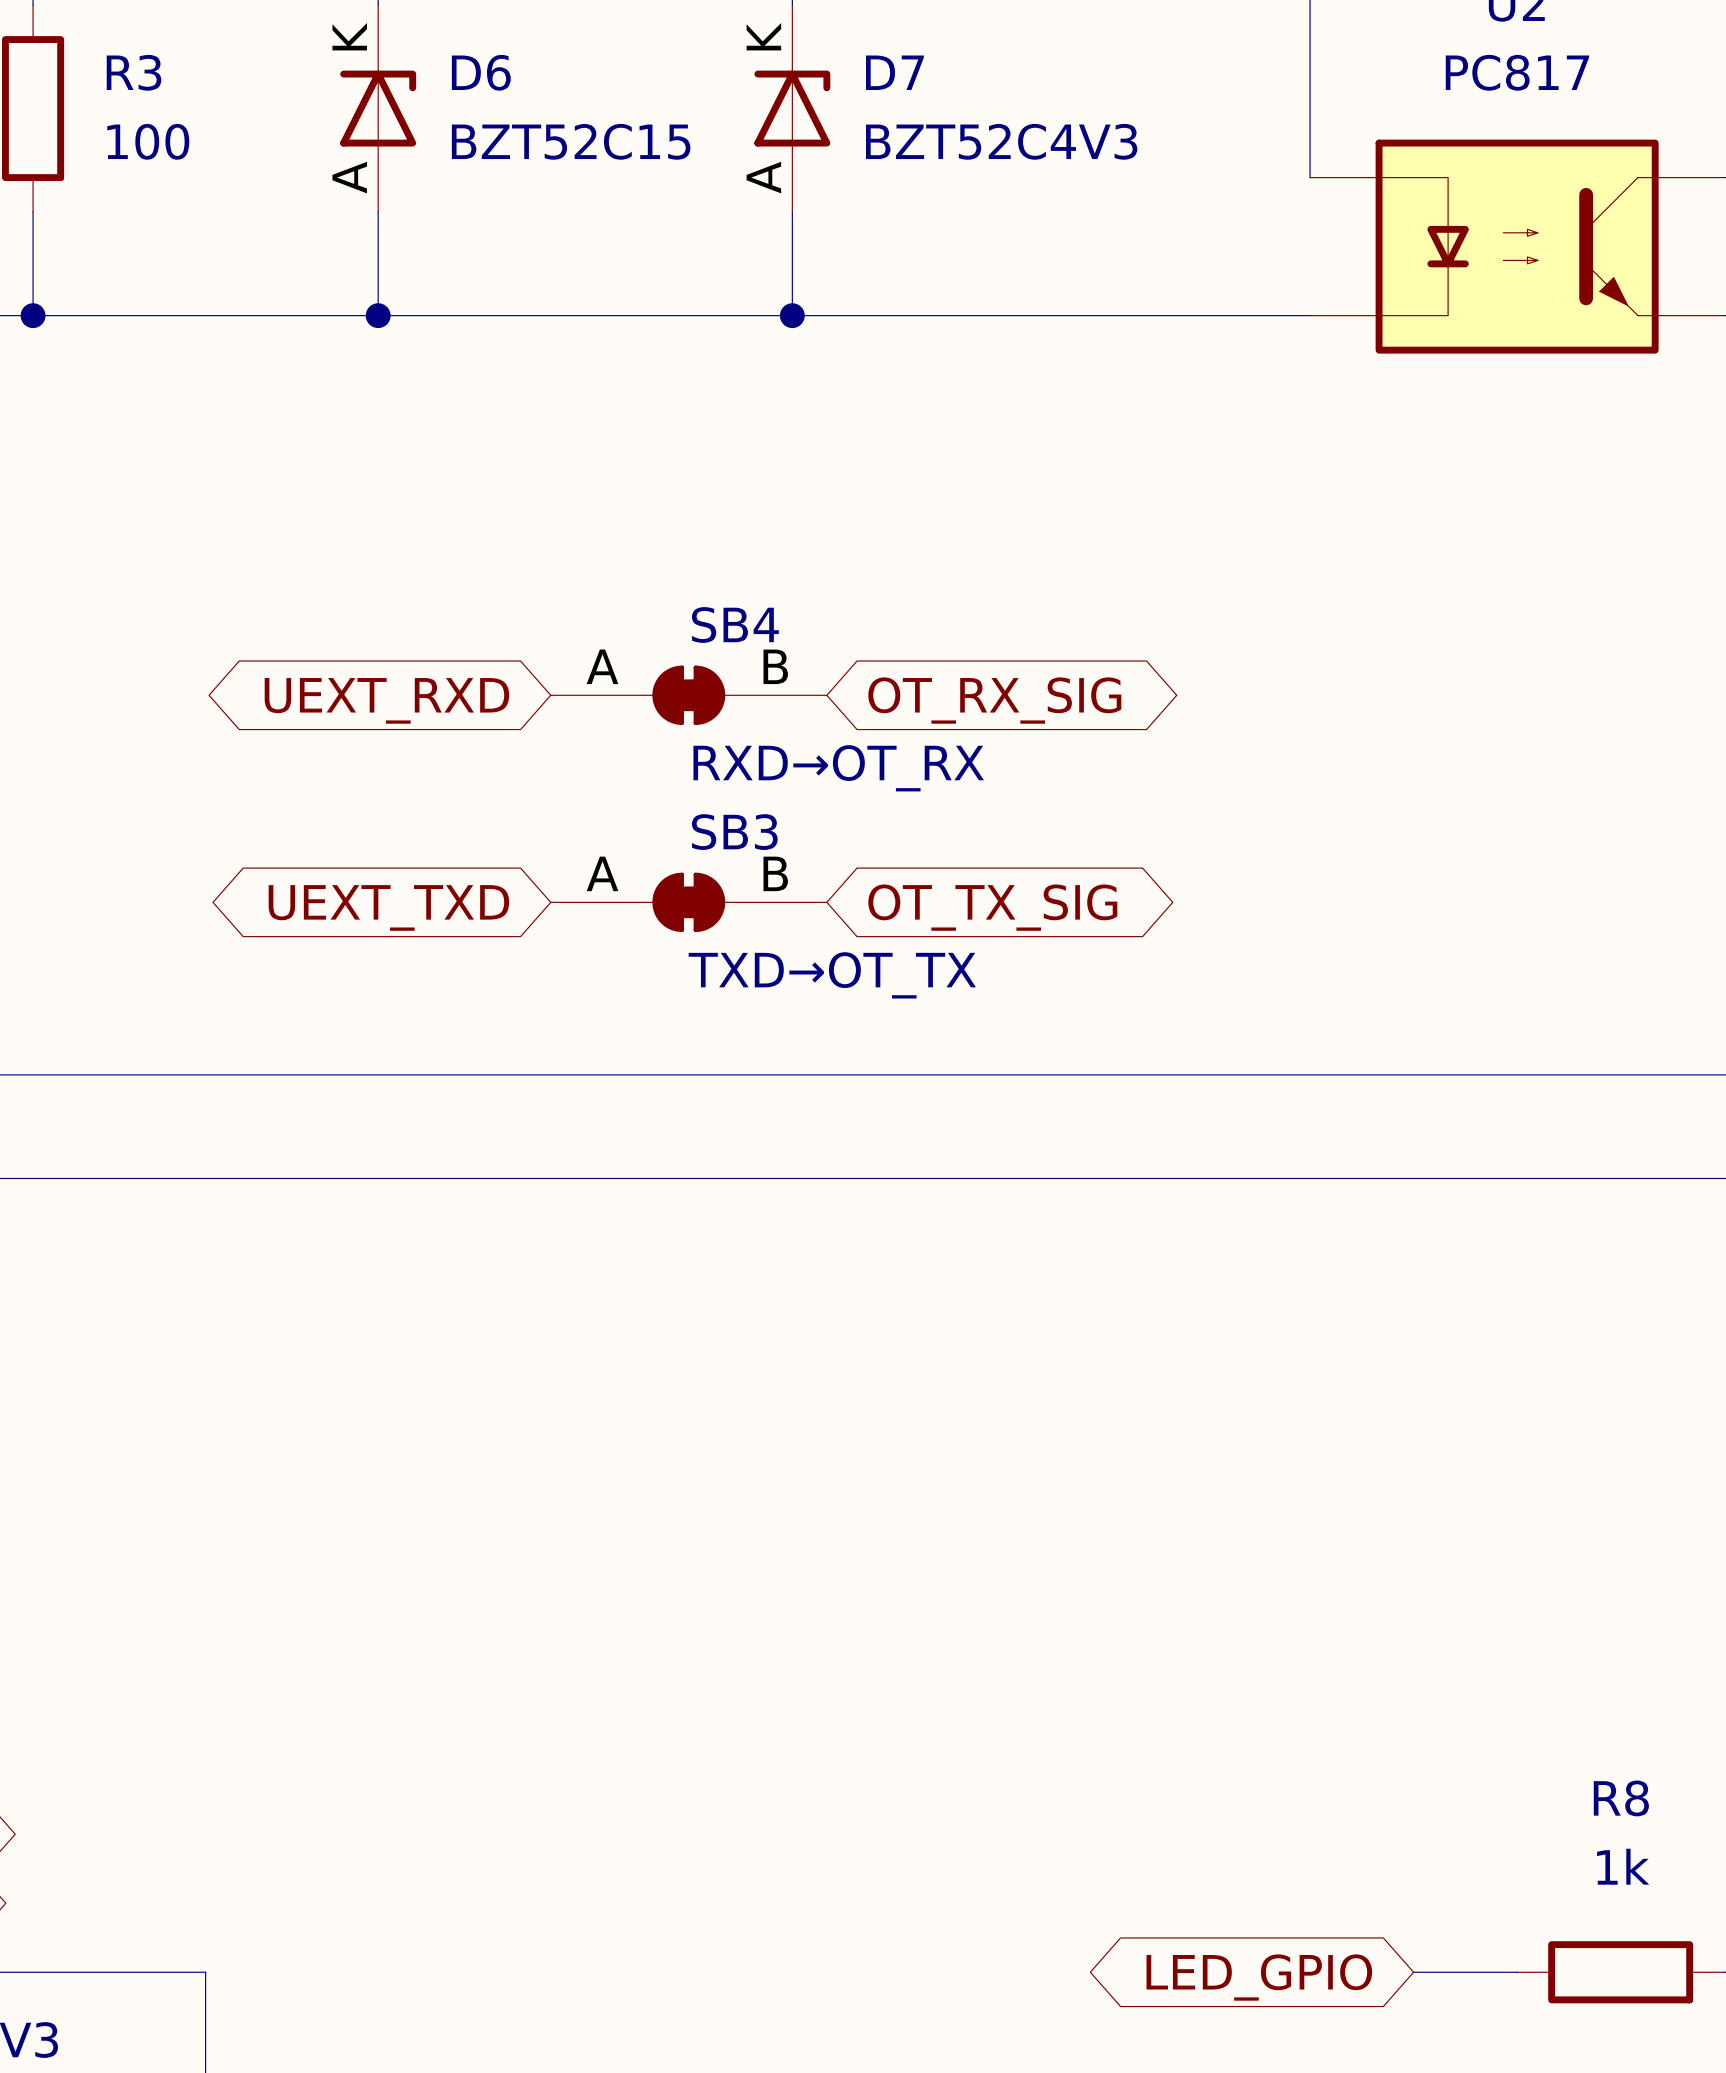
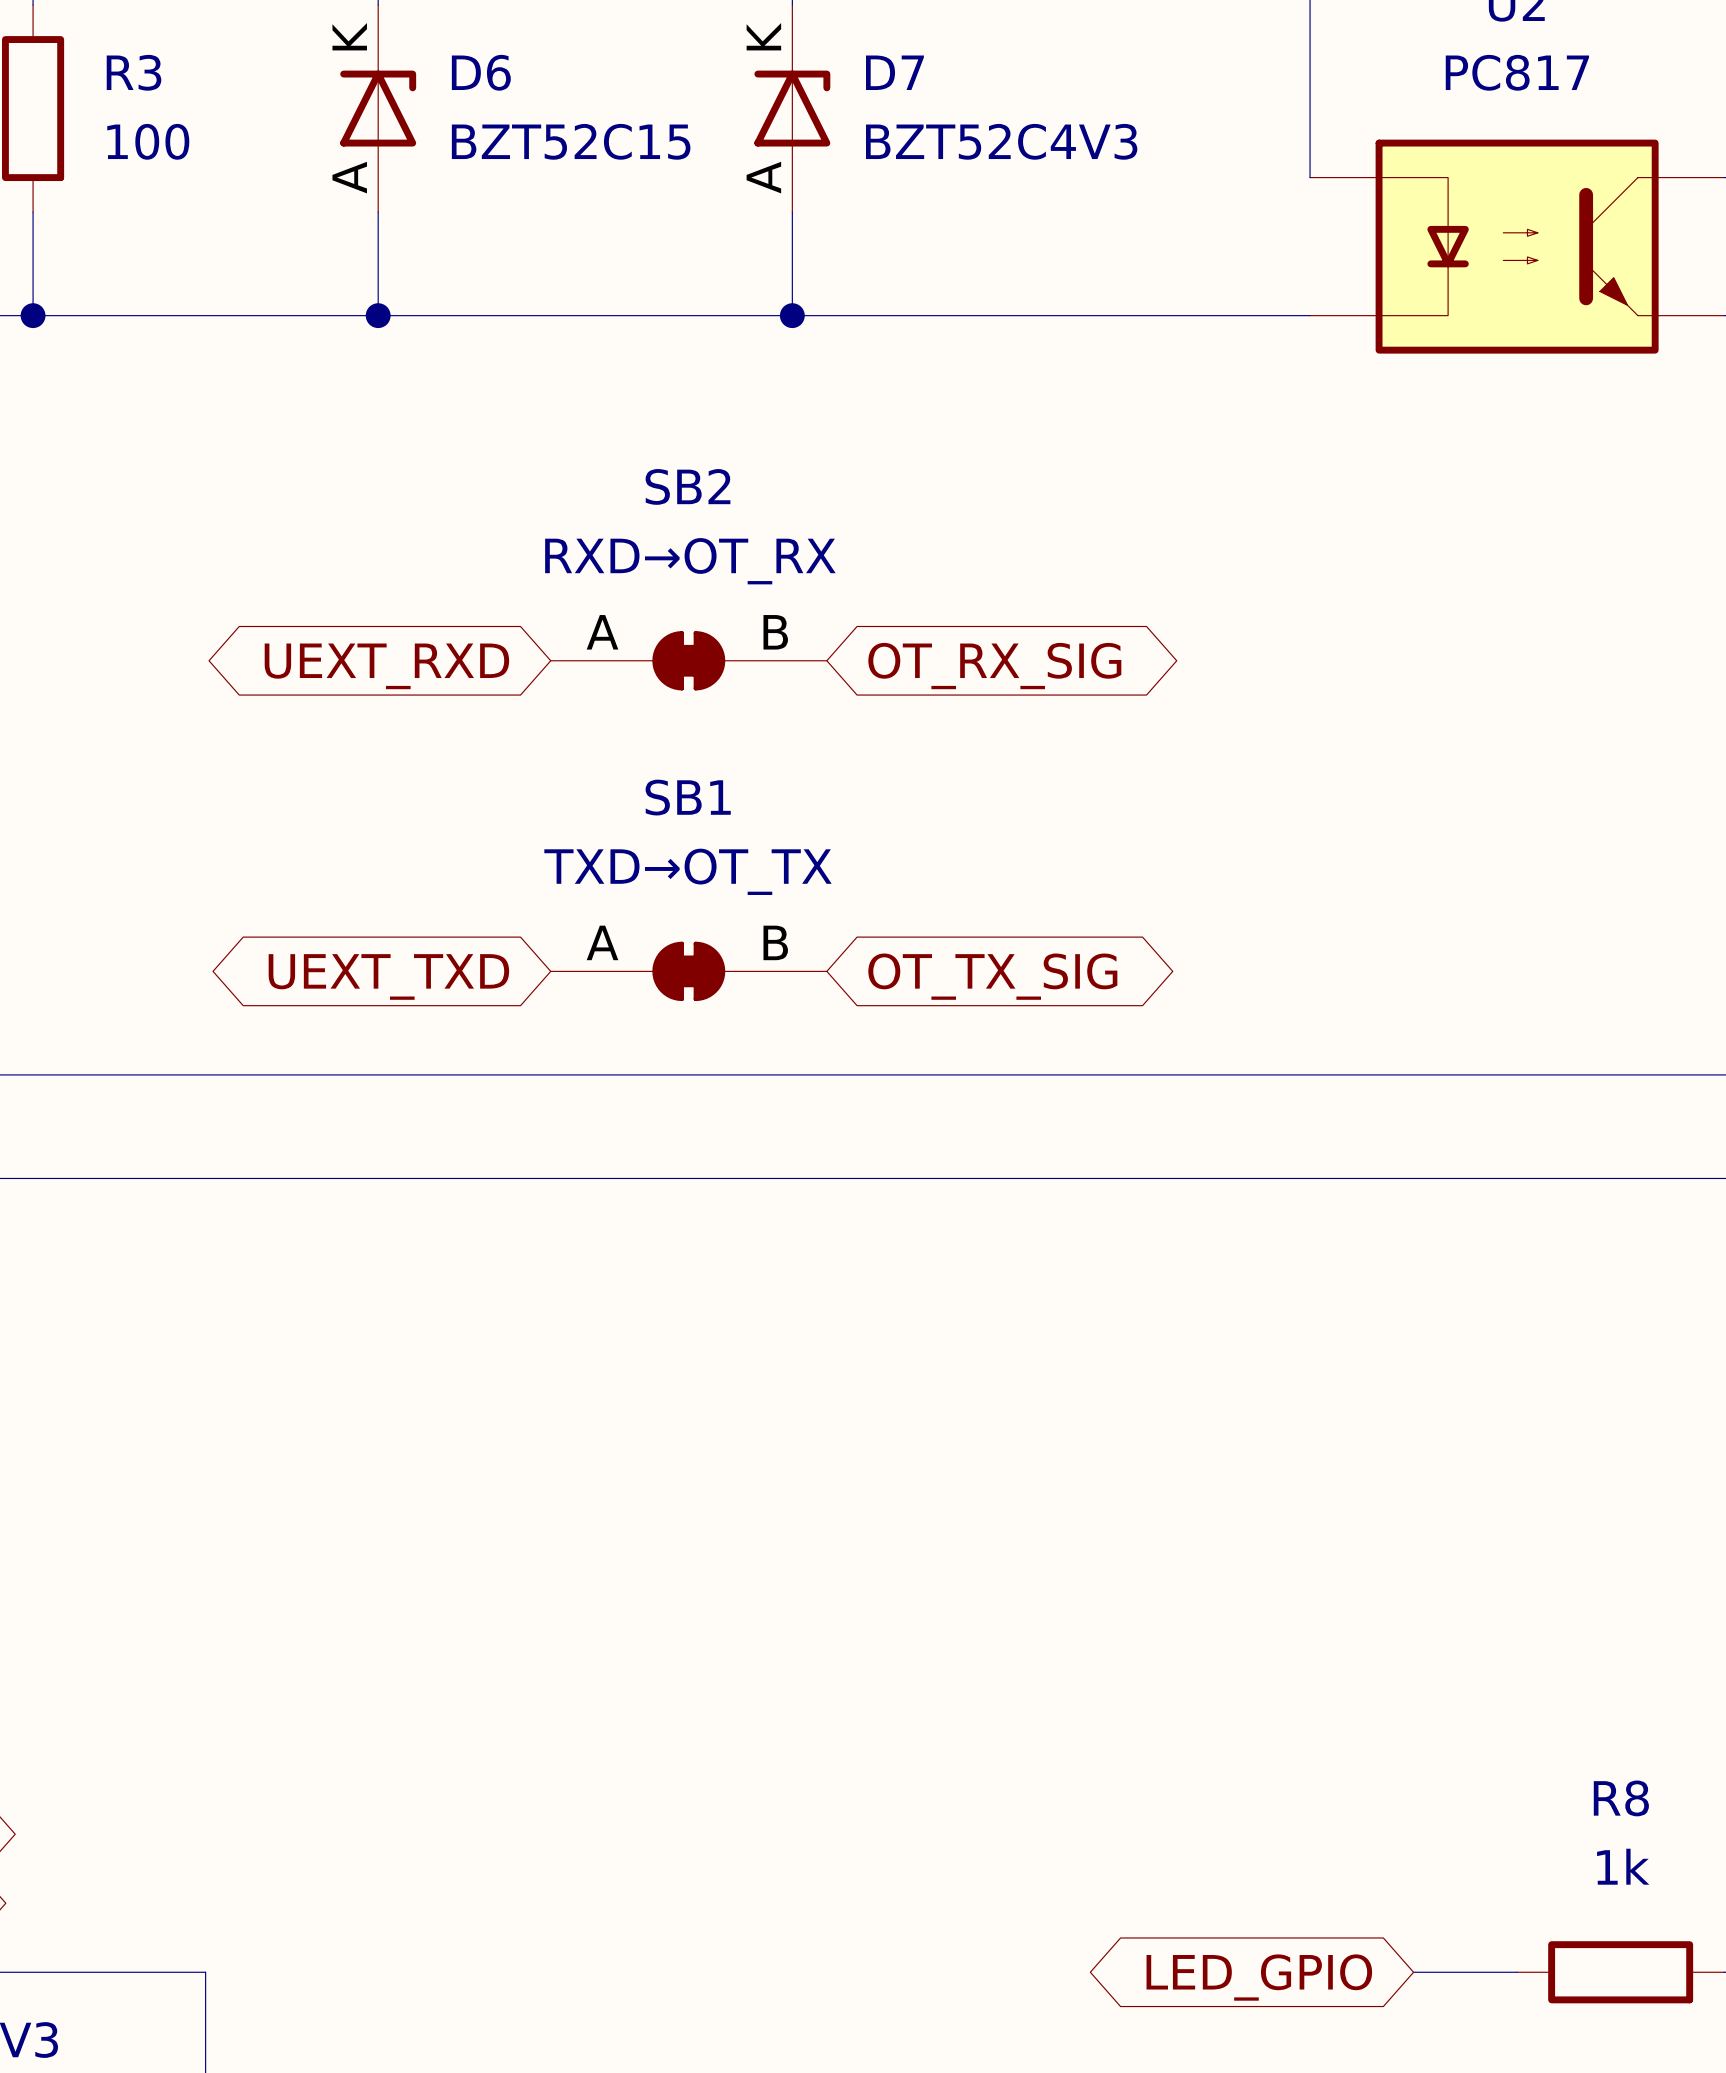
SB2: none -> RXD→OT_RX (688, 660)
SB4: RXD→OT_RX (688, 695) -> none
global label position: UEXT_RXD (386, 700) -> UEXT_RXD (386, 666)
global label position: OT_RX_SIG (994, 700) -> OT_RX_SIG (994, 666)
SB3: TXD→OT_TX (688, 902) -> none
global label position: UEXT_TXD (388, 907) -> UEXT_TXD (388, 976)
global label position: OT_TX_SIG (992, 907) -> OT_TX_SIG (992, 976)
SB1: none -> TXD→OT_TX (688, 971)

